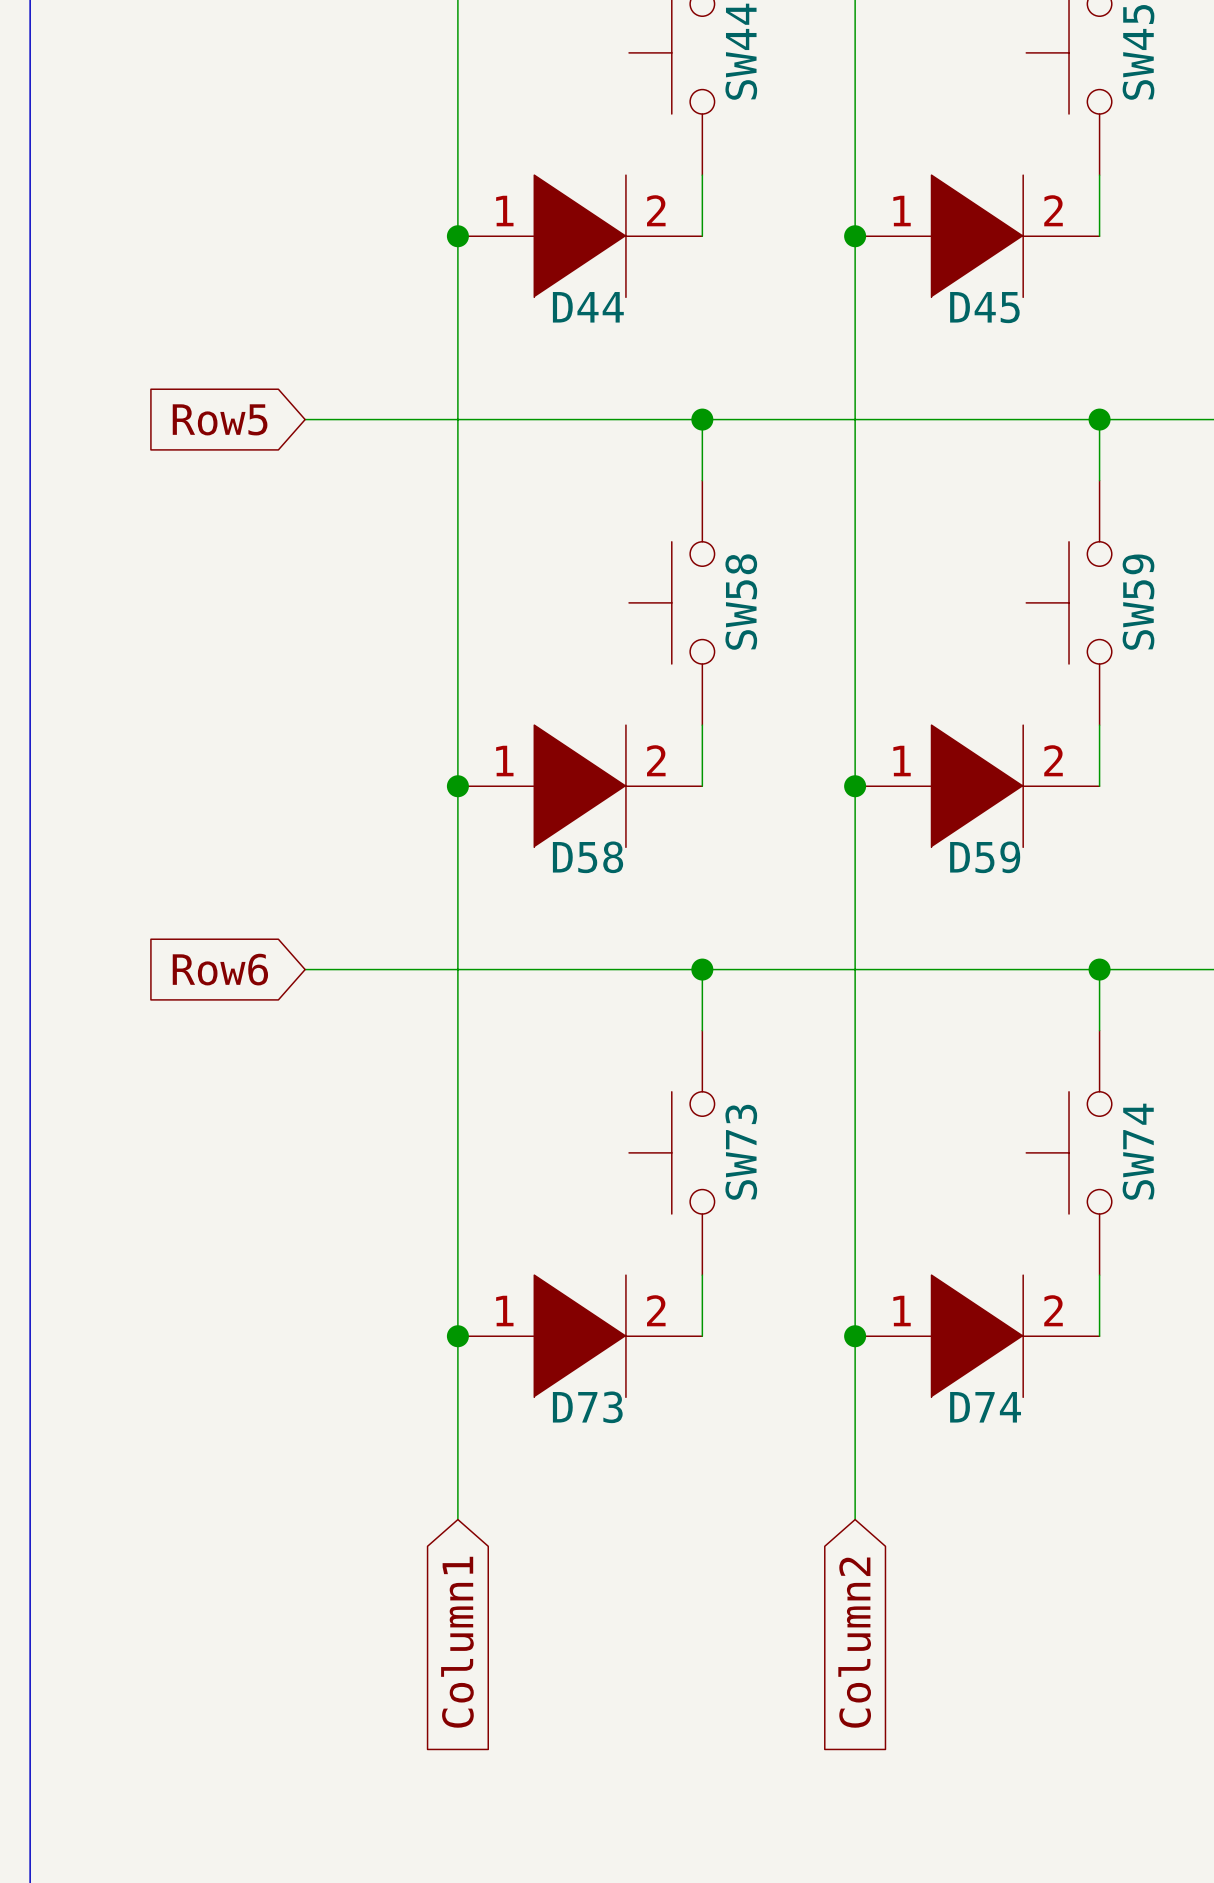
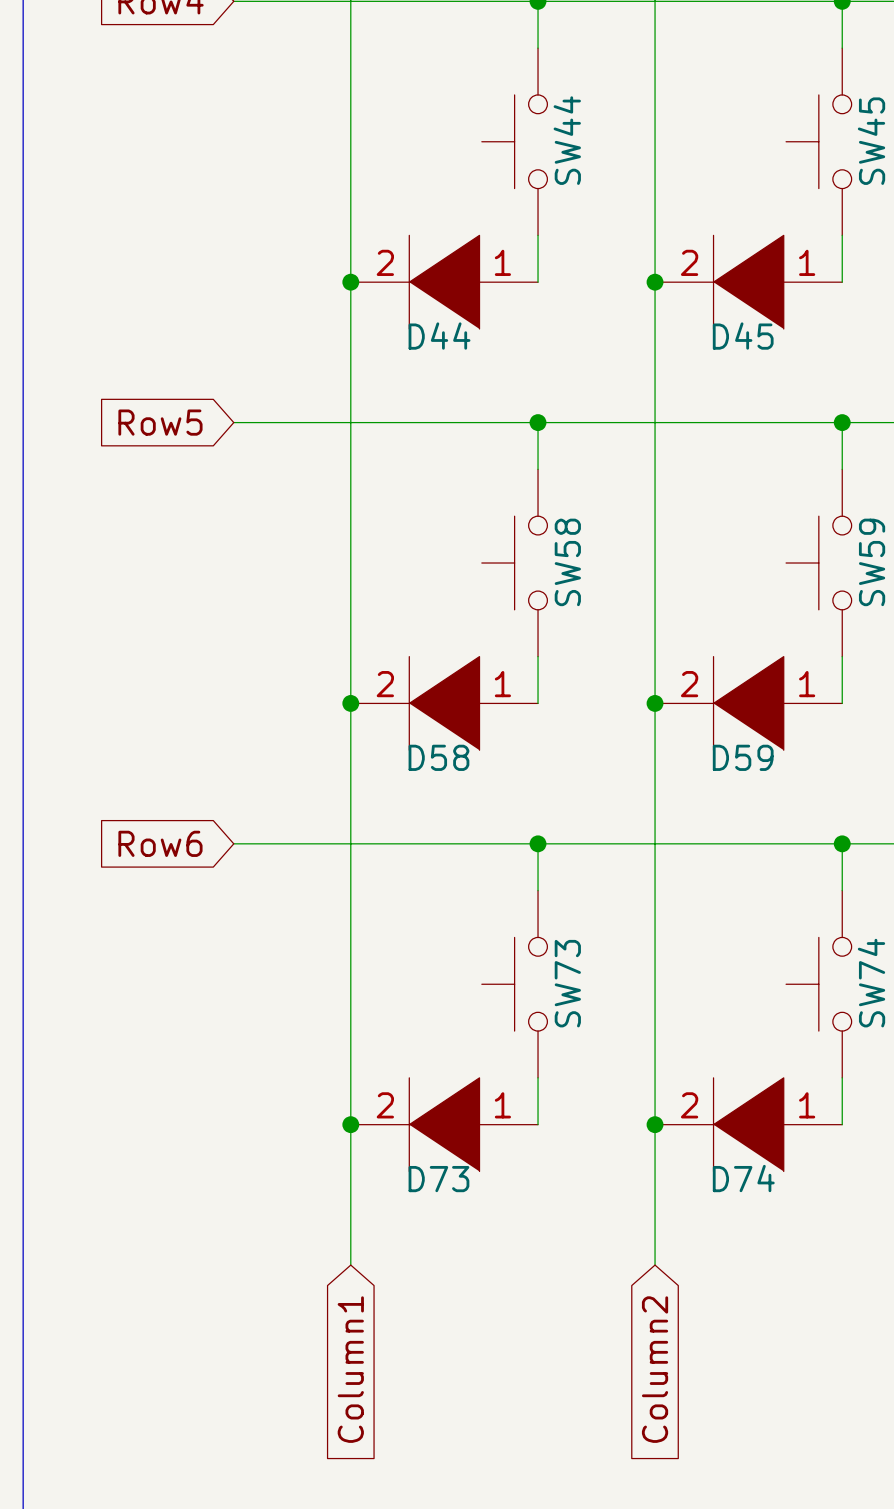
D44 flip: as is (580, 236) -> left-right (444, 282)
D45 flip: as is (977, 236) -> left-right (748, 282)
D58 flip: as is (580, 786) -> left-right (444, 703)
D59 flip: as is (977, 786) -> left-right (748, 703)
D73 flip: as is (580, 1336) -> left-right (444, 1124)
D74 flip: as is (977, 1336) -> left-right (748, 1124)

